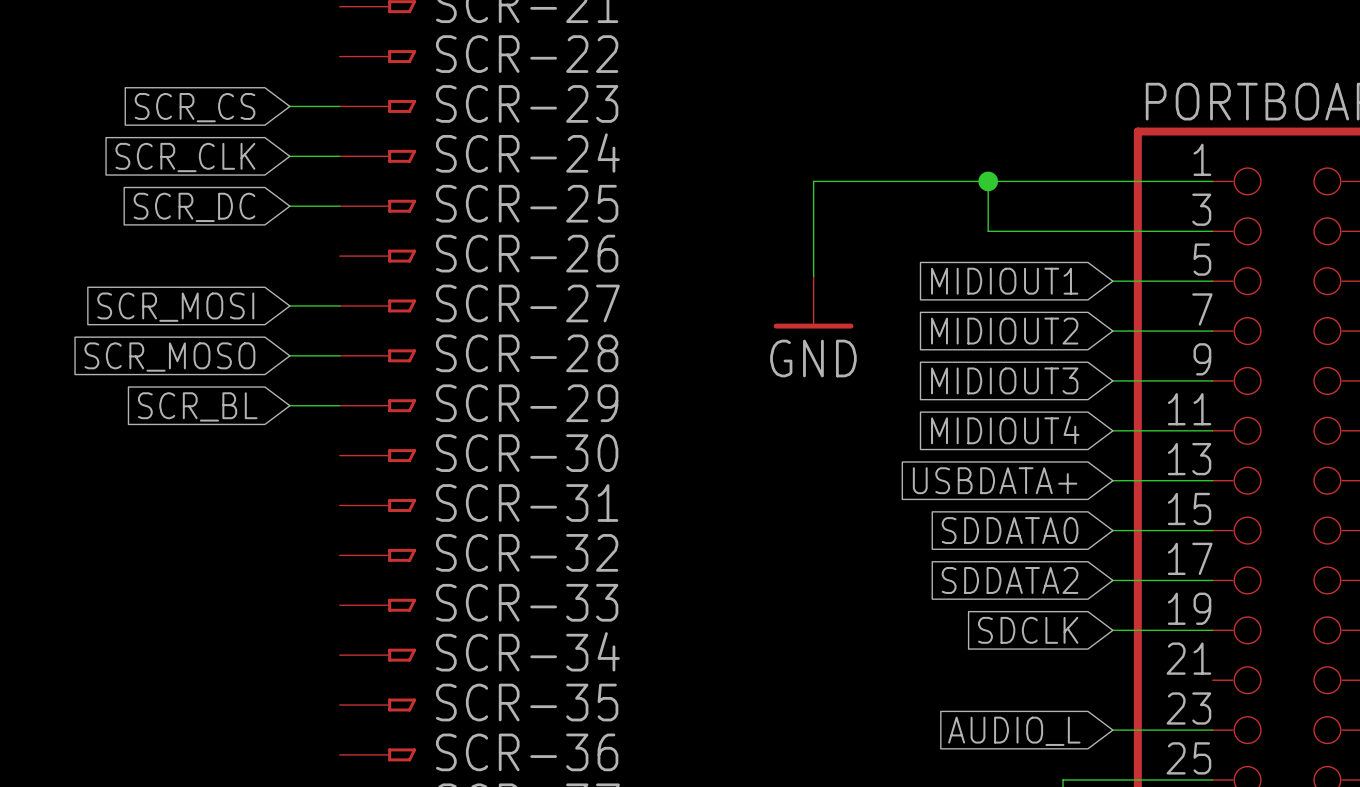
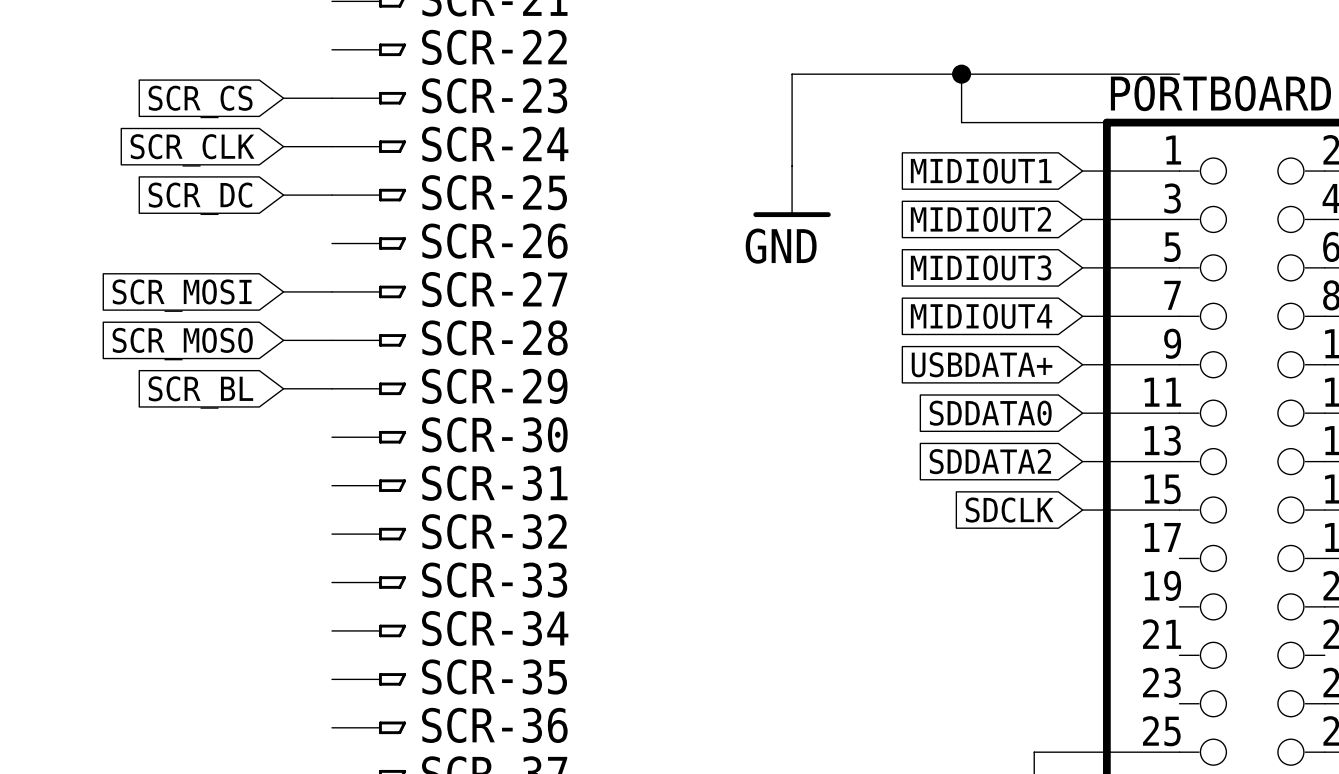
wire: none -> (961, 74) (961, 122) (1179, 122)
wire: none -> (1179, 74) (792, 74) (792, 166)
wire: (988, 181) (988, 231) (1112, 231) -> none
junction position: (988, 181) -> (961, 74)
global label: none -> MIDIOUT1 (981, 171)
wire: (1112, 181) (813, 181) (813, 276) -> none
global label: none -> MIDIOUT2 (980, 219)
global label: MIDIOUT1 (1004, 281) -> MIDIOUT3 (981, 267)
power symbol position: GND (813, 302) -> GND (792, 191)
global label: MIDIOUT2 (1004, 331) -> MIDIOUT4 (981, 316)
global label: MIDIOUT3 (1004, 380) -> USBDATA+ (982, 364)
global label: MIDIOUT4 (1005, 430) -> SDDATA0 (990, 413)
global label: USBDATA+ (995, 480) -> SDDATA2 (990, 461)
global label: SDDATA0 (1010, 530) -> SDCLK (1009, 510)
global label: SDDATA2 (1010, 580) -> none
wire: (1112, 580) (1212, 580) -> none
global label: SDCLK (1028, 630) -> none
wire: (1112, 630) (1212, 630) -> none
wire: (1112, 730) (1212, 730) -> none
global label: AUDIO_L (1014, 731) -> none

